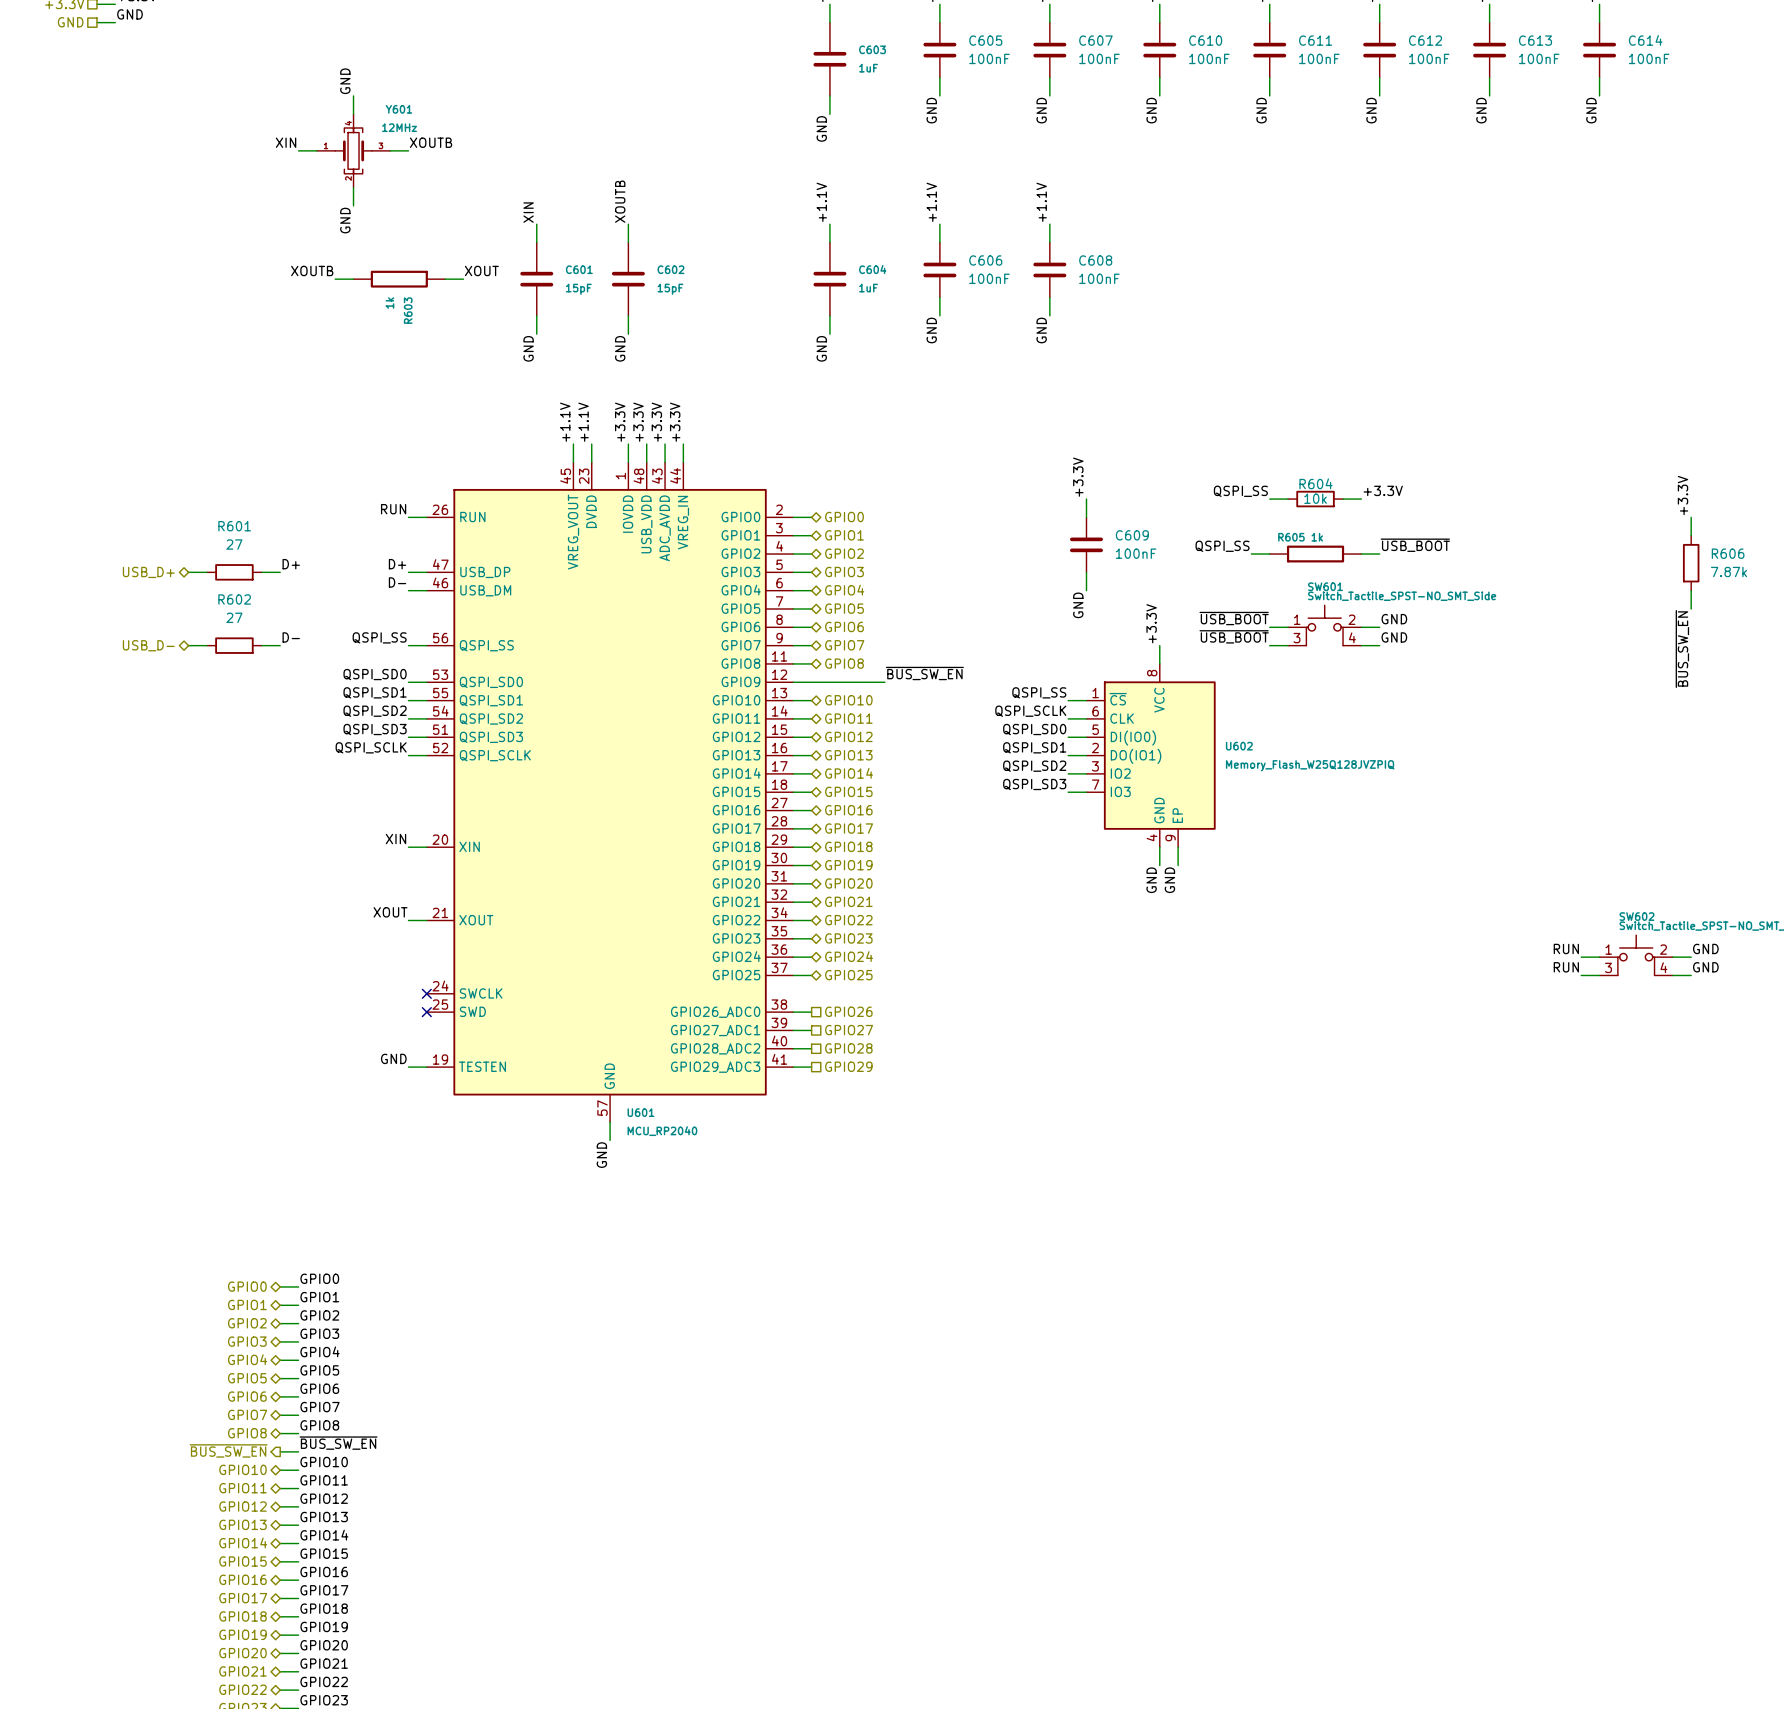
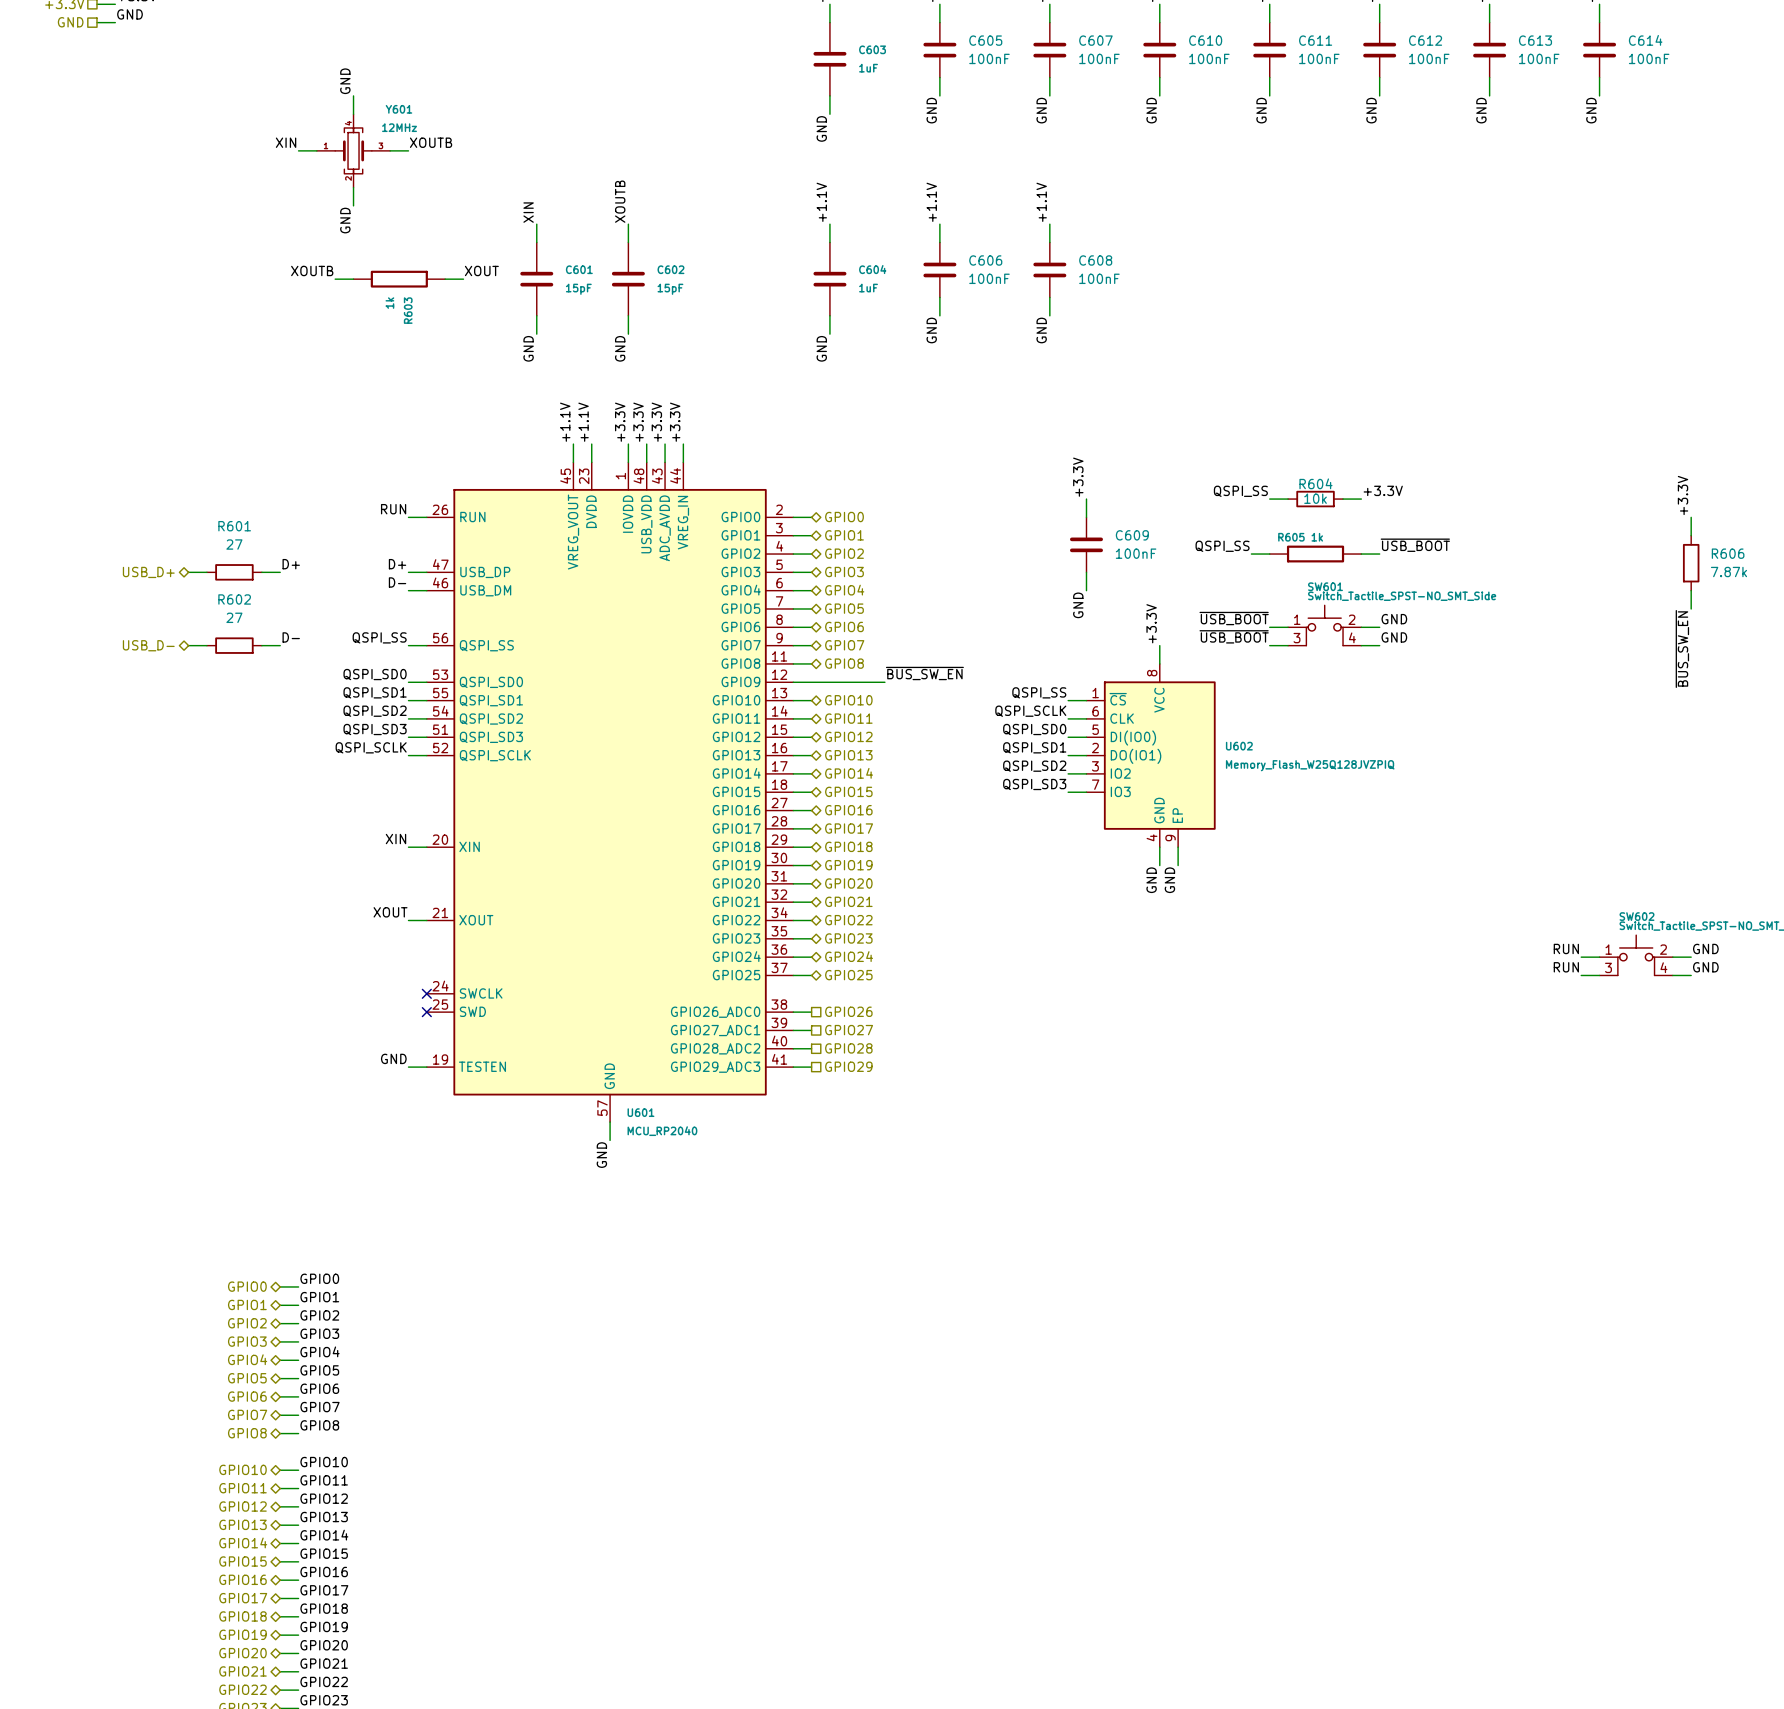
label: ~{BUS_SW_EN} (338, 1443) -> none
hierarchical label: ~{BUS_SW_EN} (228, 1450) -> none
wire: (280, 1451) (298, 1451) -> none

